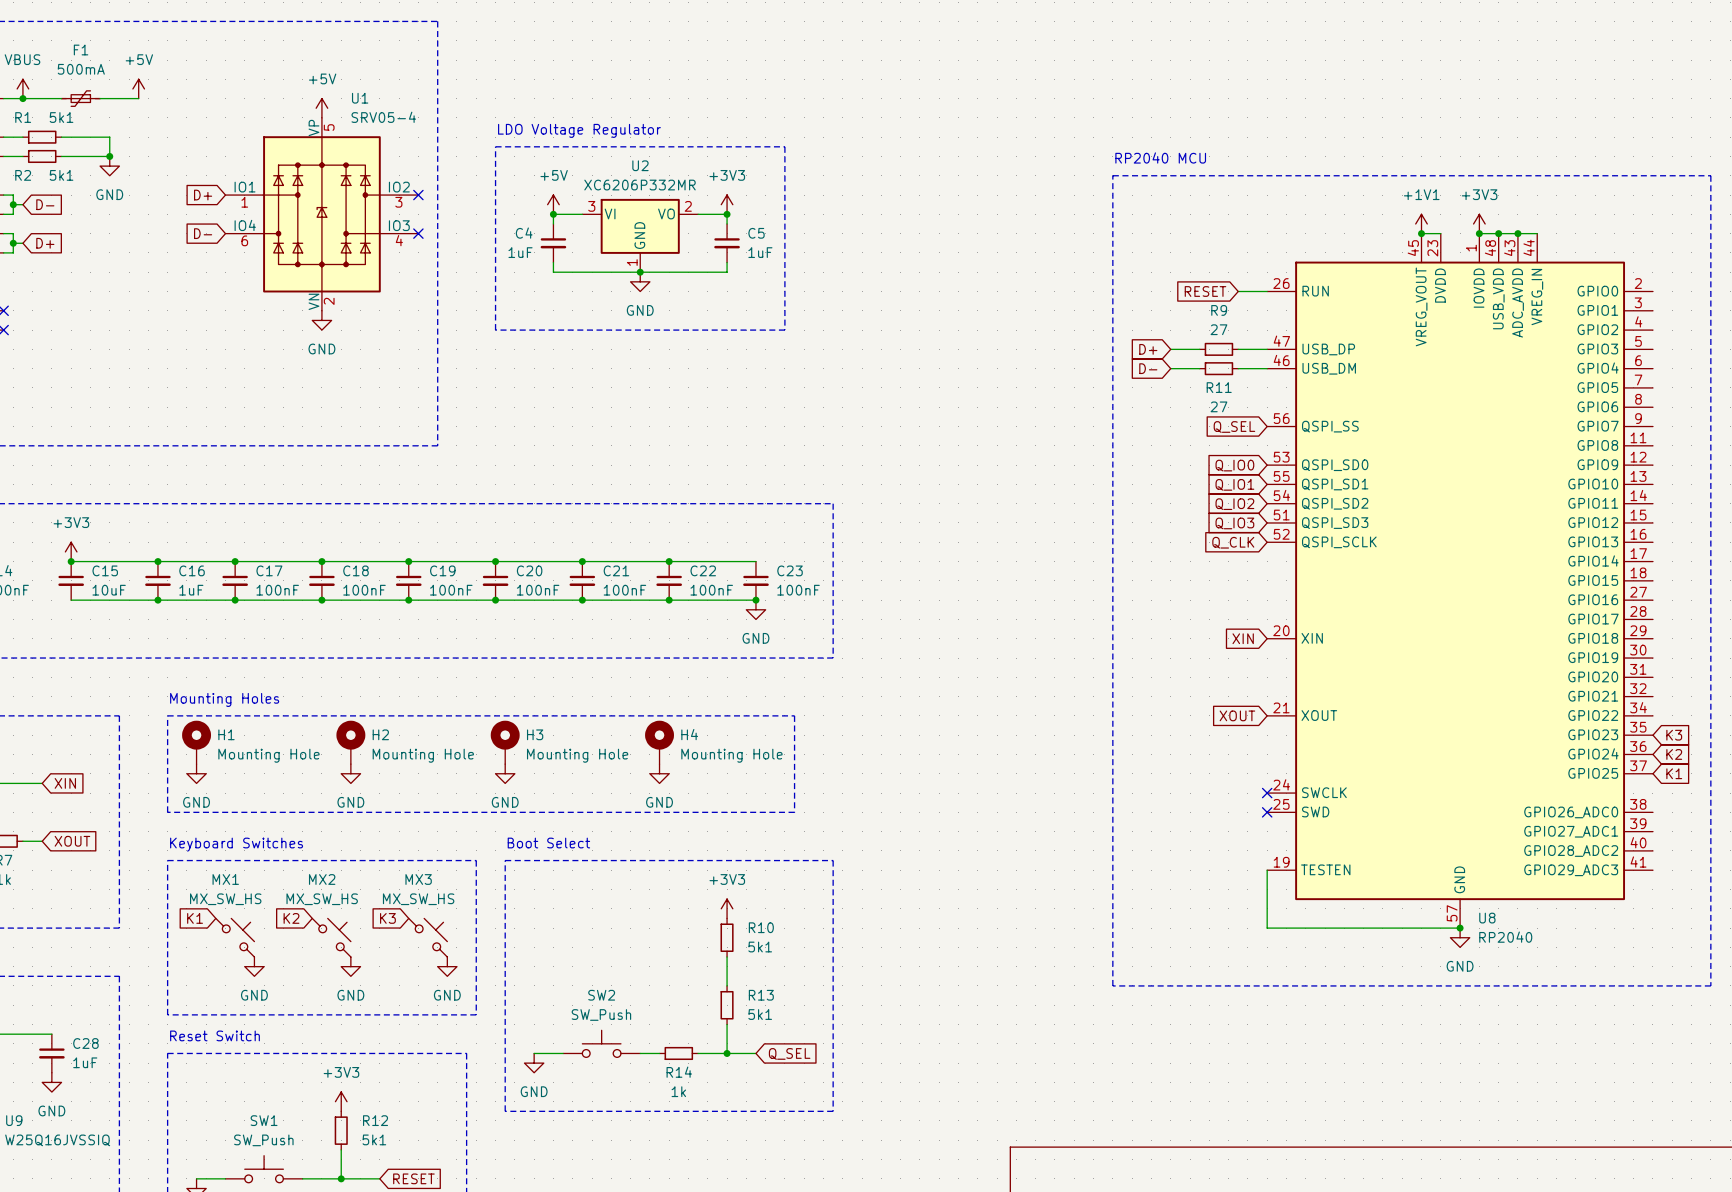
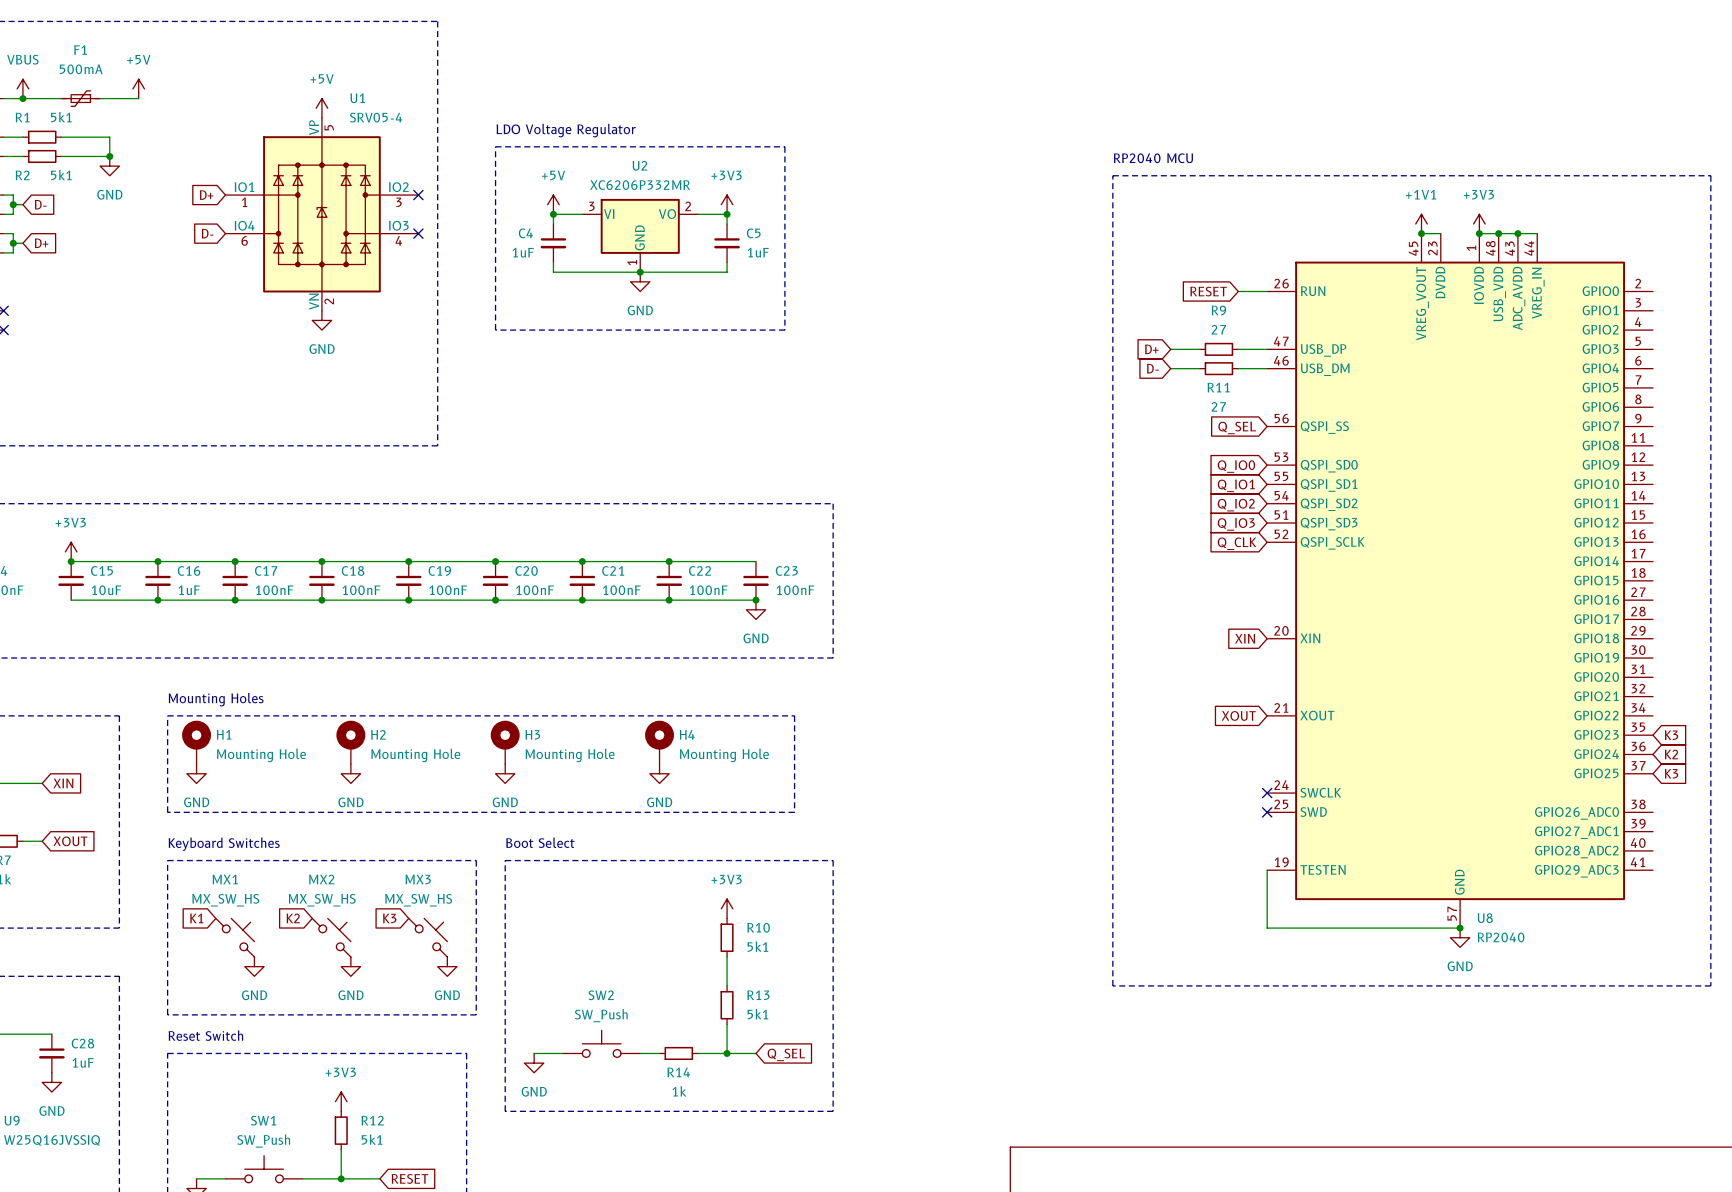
global label: K1 (1674, 773) -> K3 (1671, 773)

